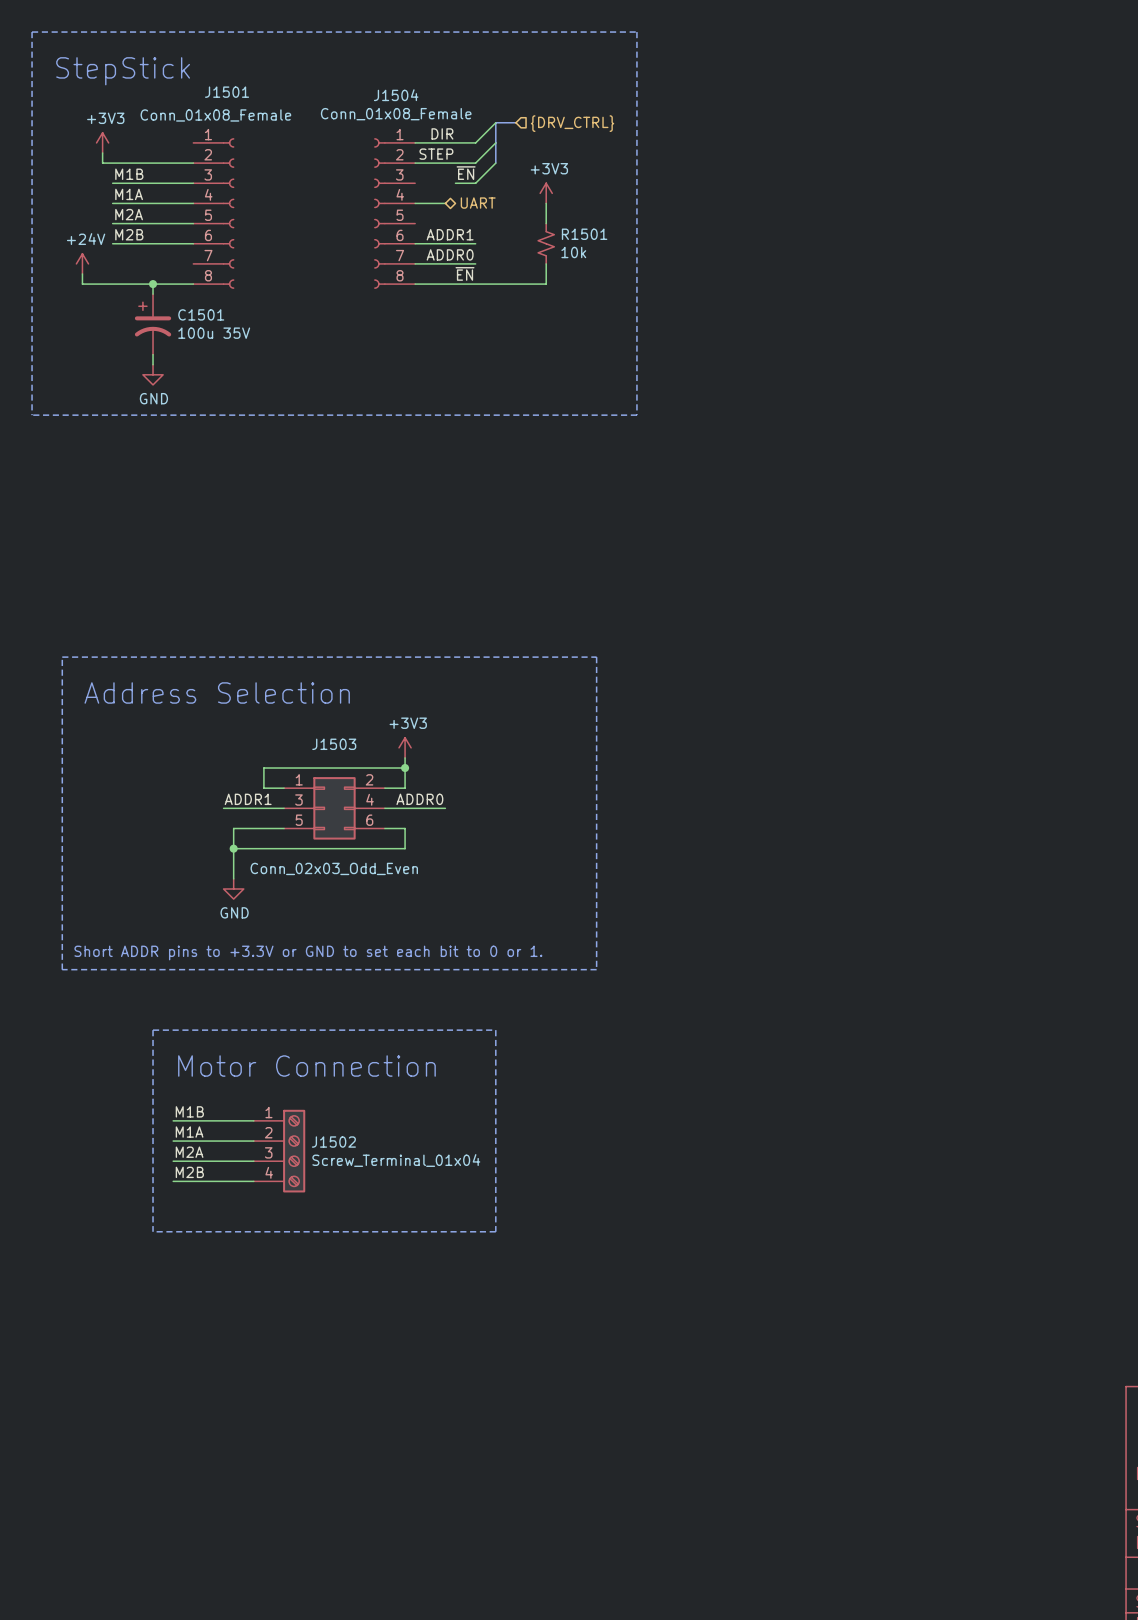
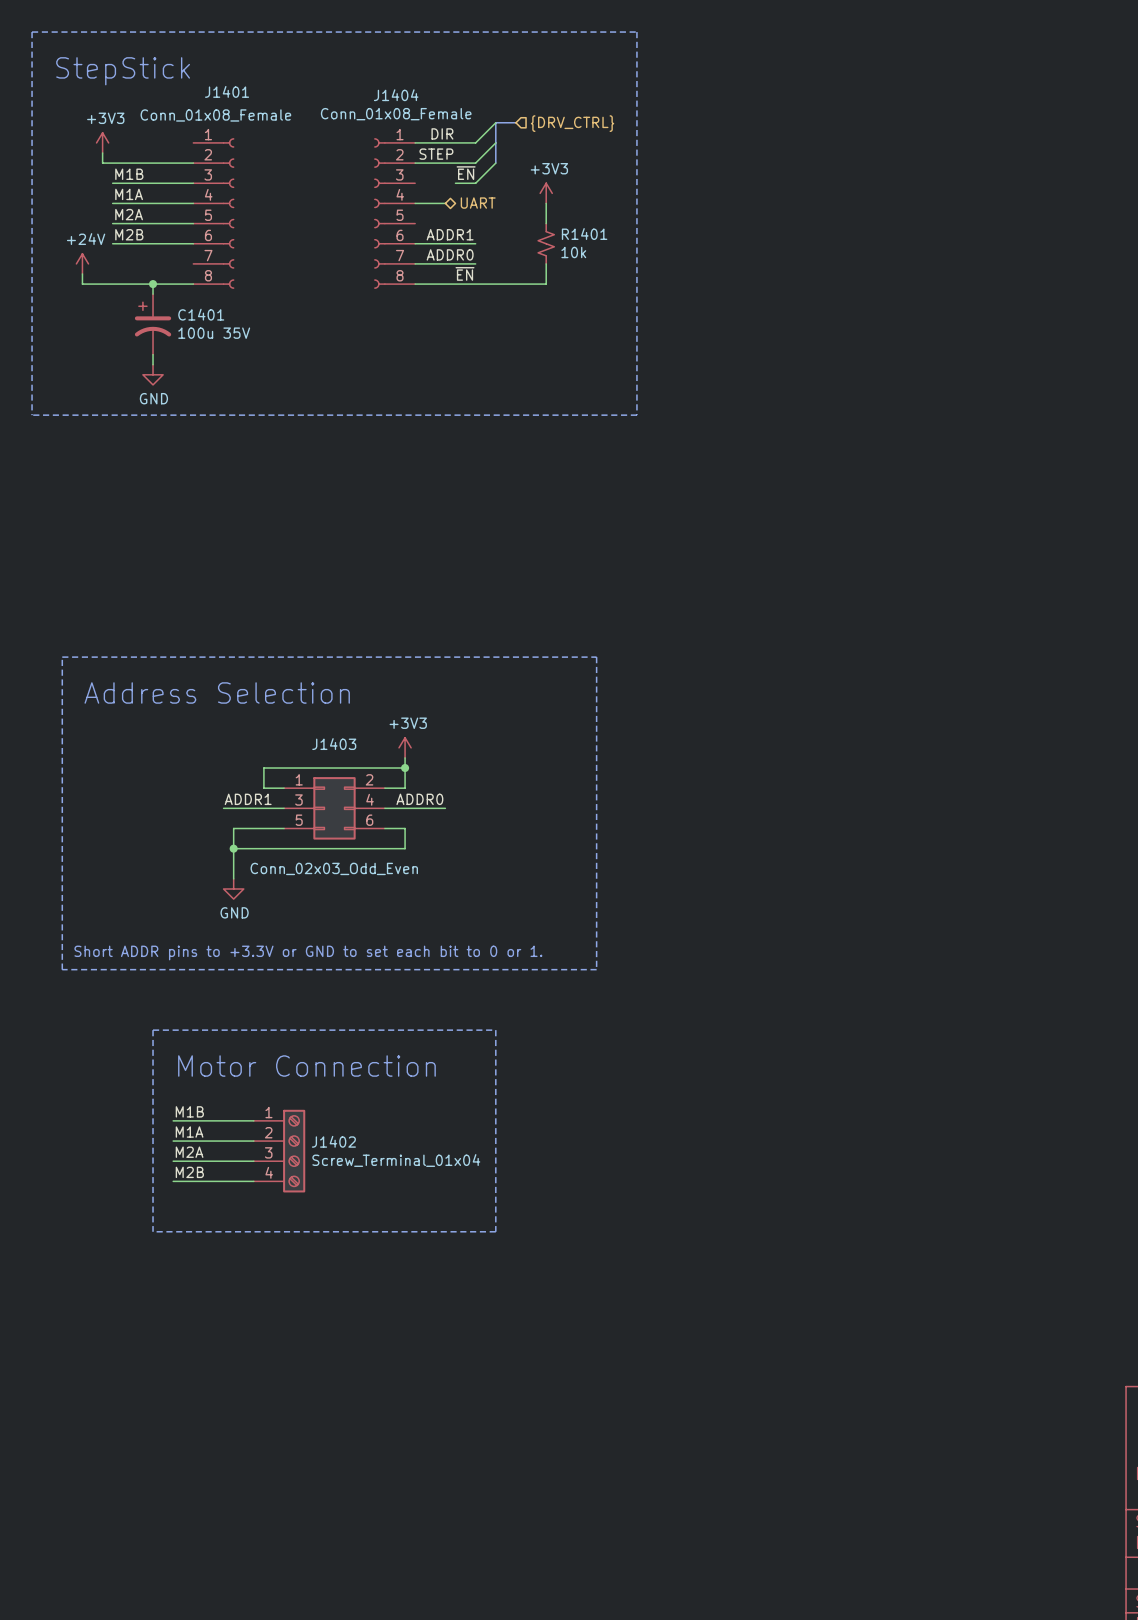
J1501 name: J1501 (227, 92) -> J1401 (227, 91)
J1504 name: J1504 (396, 95) -> J1404 (396, 95)
R1501 name: R1501 (584, 234) -> R1401 (584, 234)
C1501 name: C1501 (201, 314) -> C1401 (201, 314)
J1503 name: J1503 (334, 744) -> J1403 (334, 744)
J1502 name: J1502 (333, 1142) -> J1402 (333, 1141)

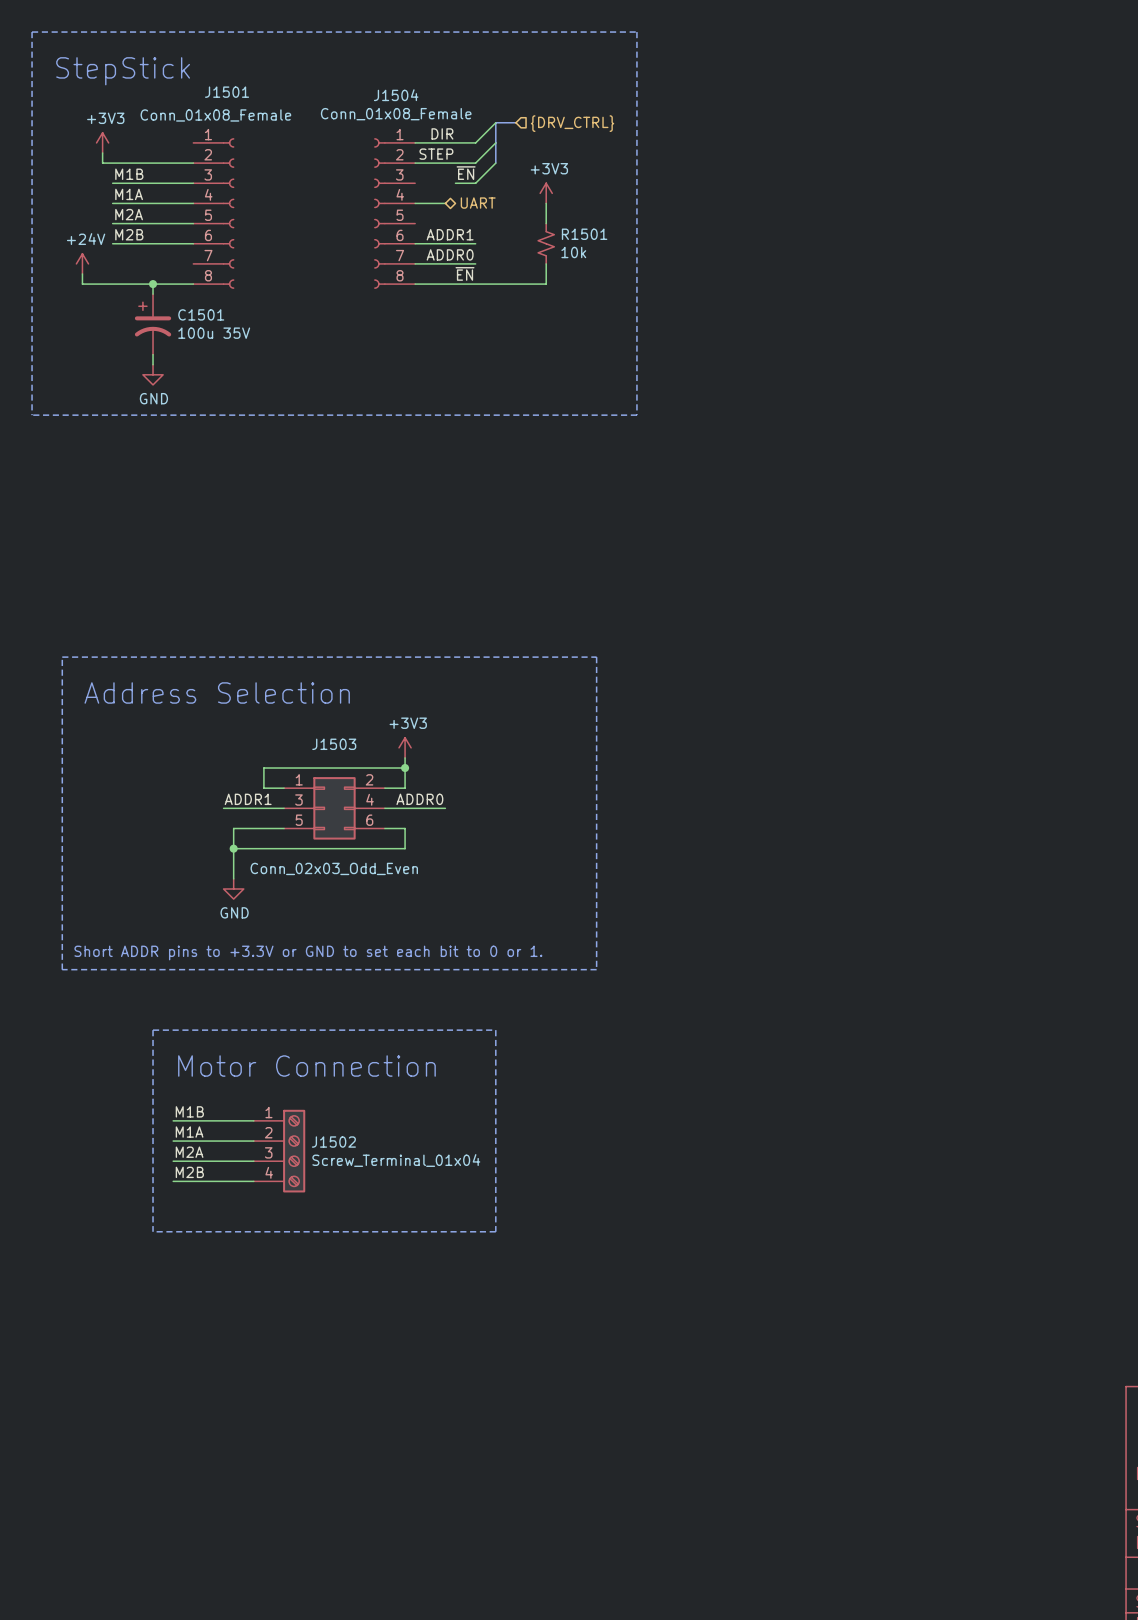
J1401 name: J1401 (227, 91) -> J1501 (227, 92)
J1404 name: J1404 (396, 95) -> J1504 (396, 95)
R1401 name: R1401 (584, 234) -> R1501 (584, 234)
C1401 name: C1401 (201, 314) -> C1501 (201, 314)
J1403 name: J1403 (334, 744) -> J1503 (334, 744)
J1402 name: J1402 (333, 1141) -> J1502 (333, 1142)

